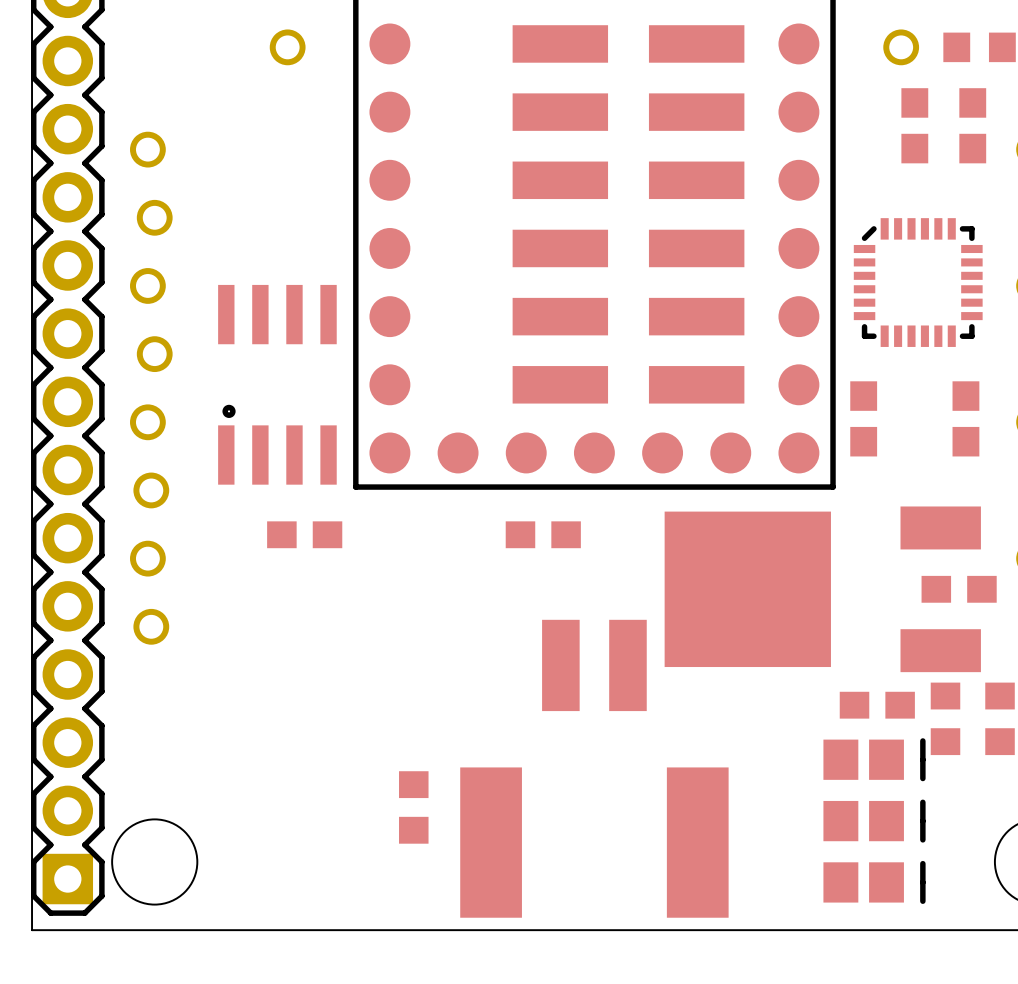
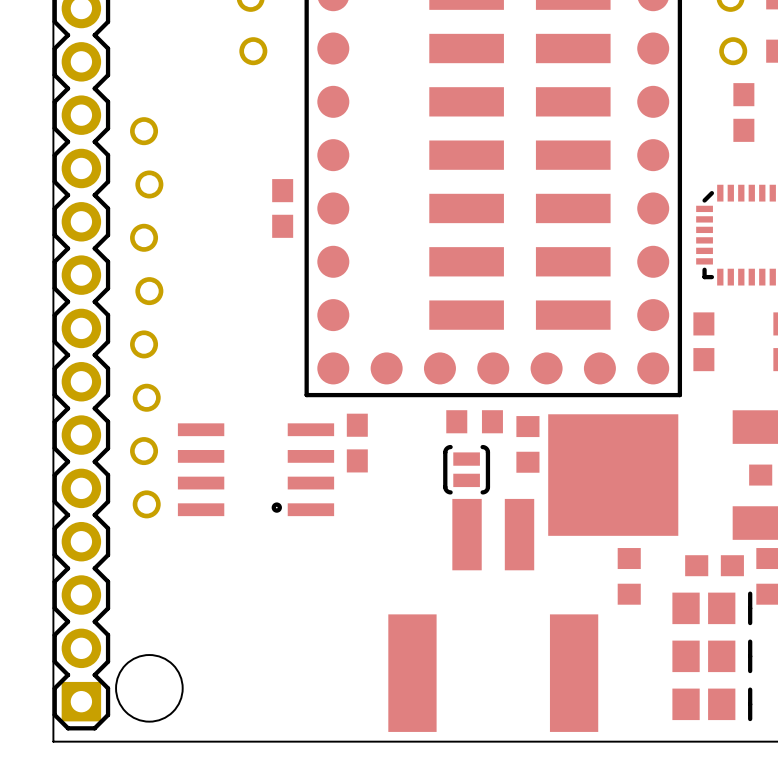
part: none -> (282, 208)
part rotation: 0° (277, 384) -> 90° counterclockwise (256, 469)
part position: (277, 384) -> (256, 469)
part: none -> (474, 421)
part: (304, 534) -> none
part: (543, 534) -> none
part: none -> (357, 443)
part: none -> (527, 444)
part: none -> (466, 469)
part: none -> (629, 576)
part: (413, 807) -> none

